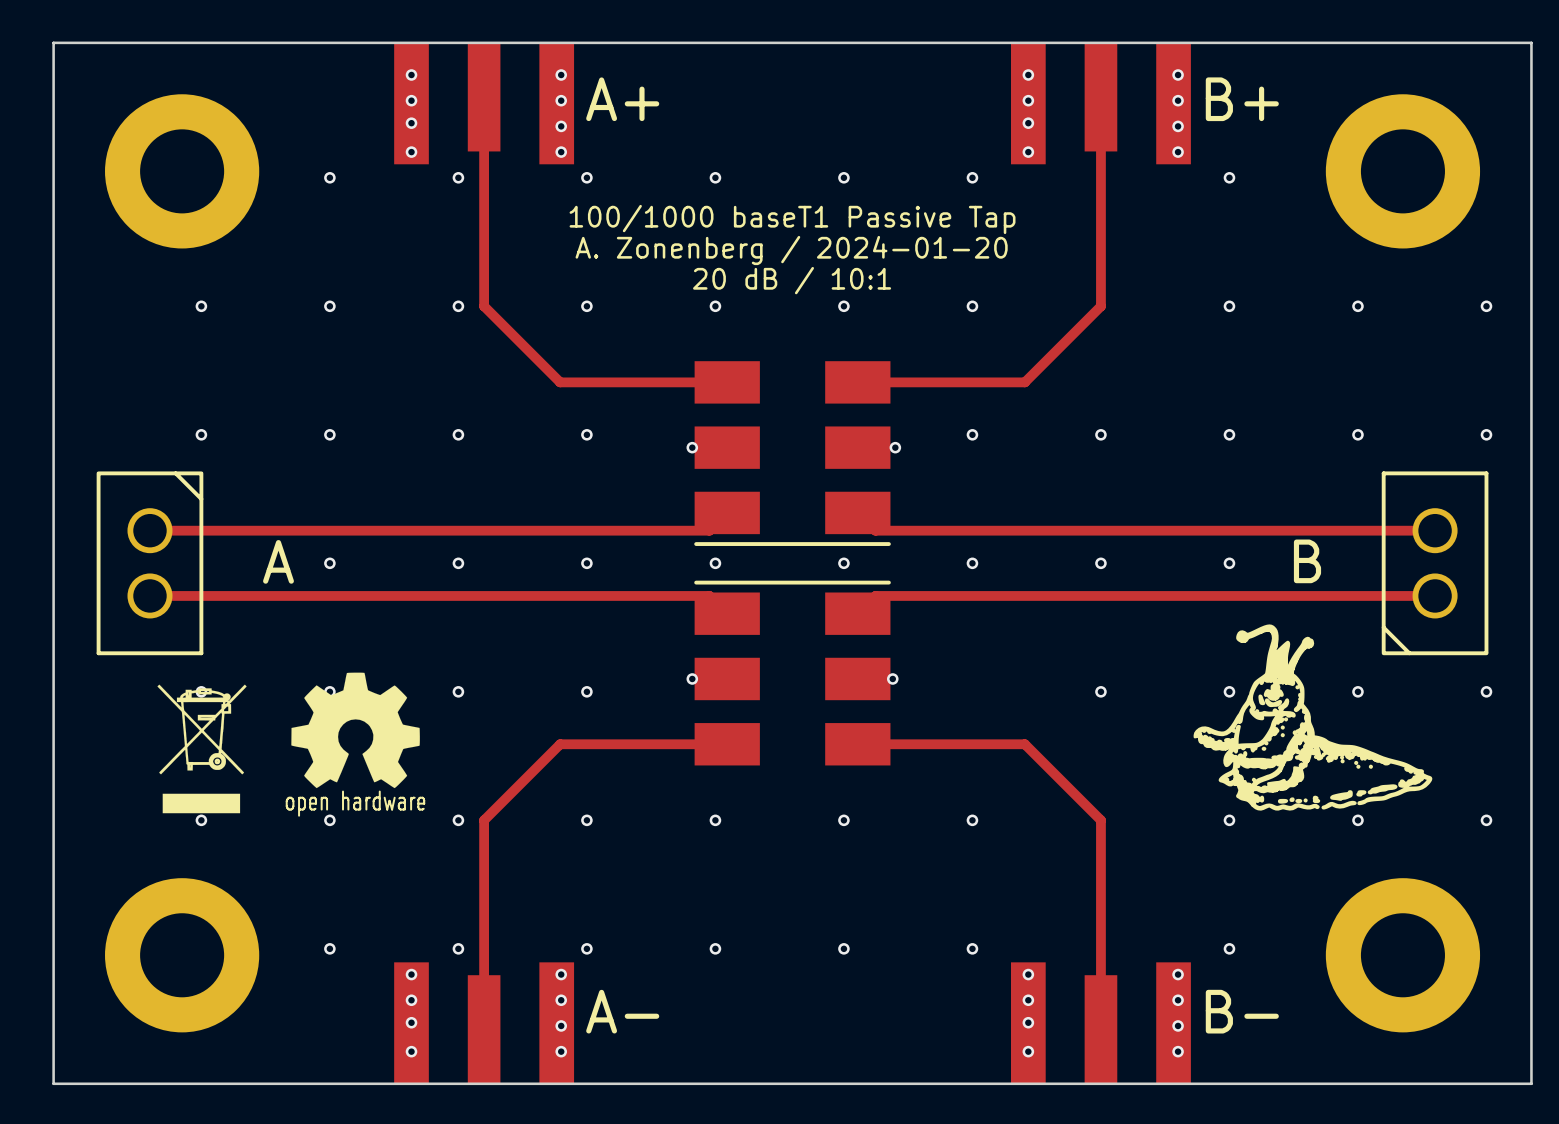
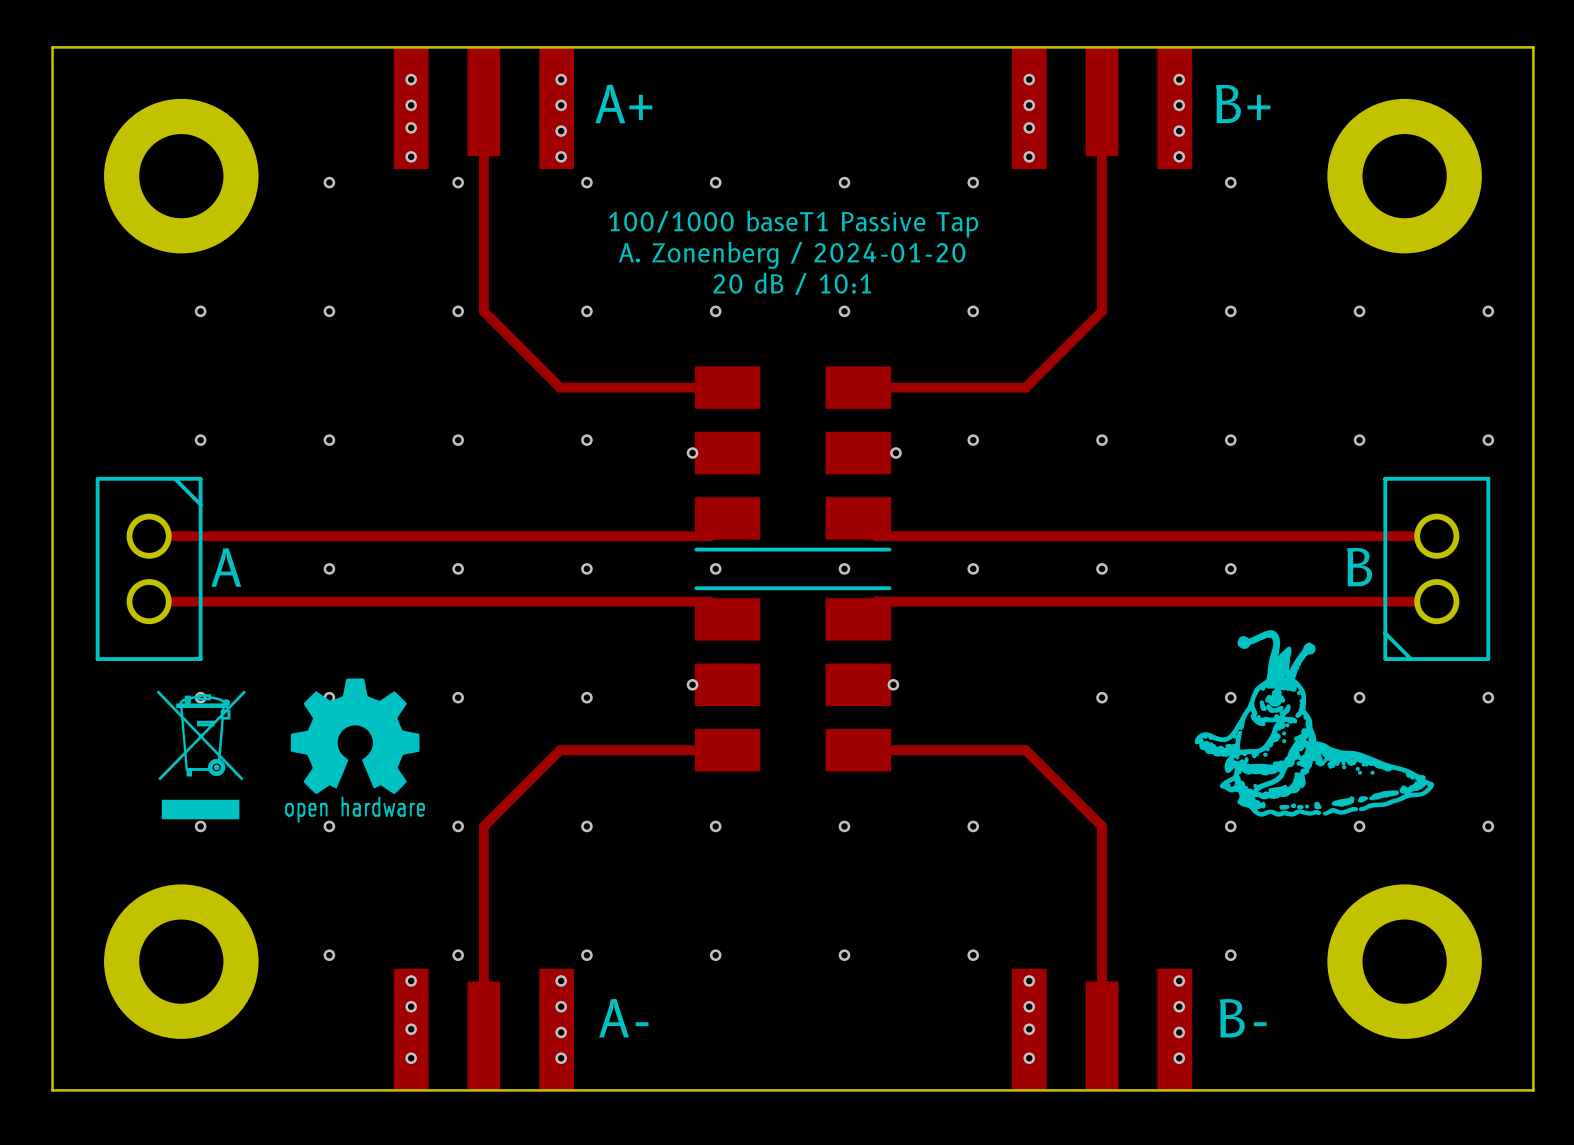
text position: A (278, 561) -> A (226, 567)
text position: B (1307, 561) -> B (1359, 567)

